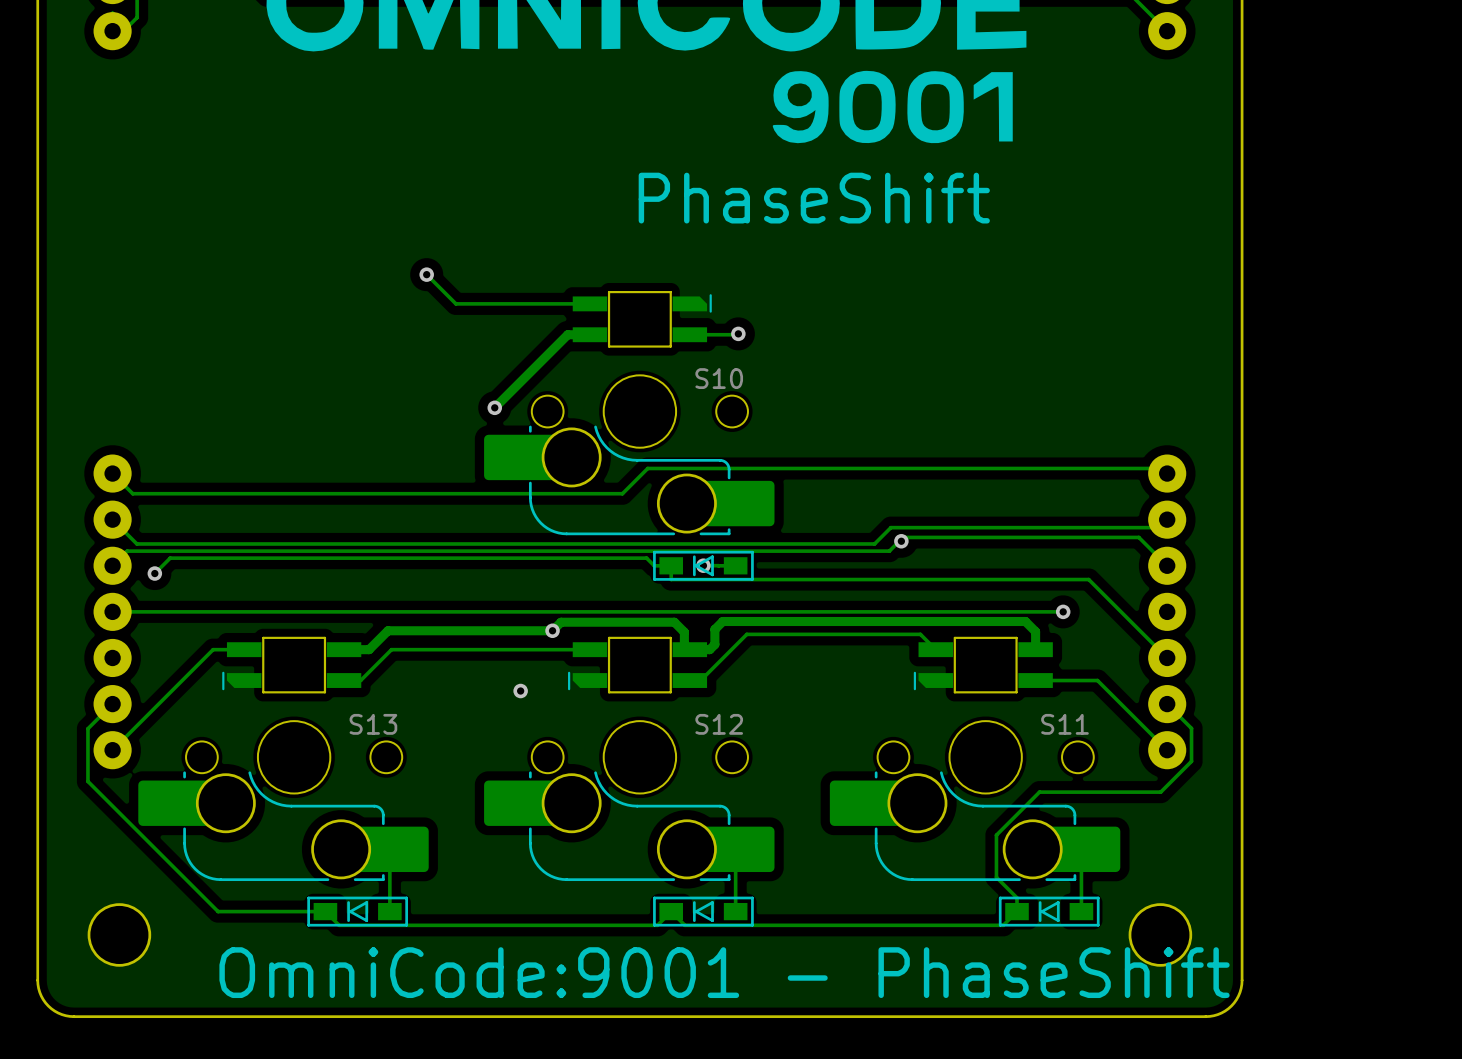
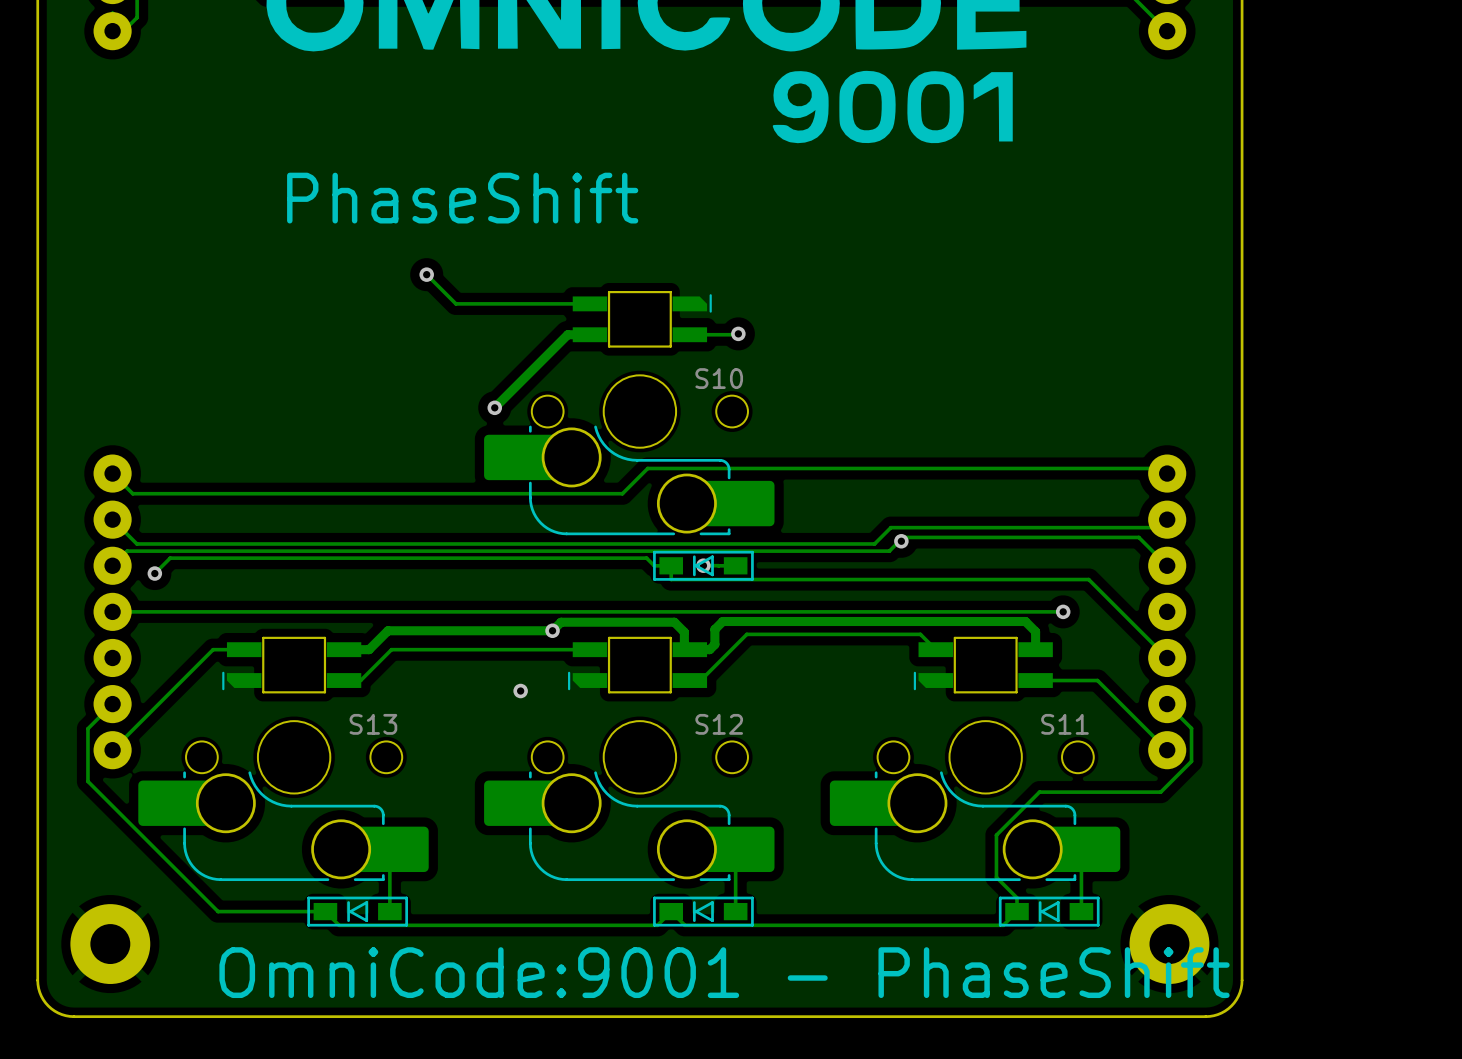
text position: PhaseShift (814, 198) -> PhaseShift (462, 198)
part footprint: [87, 903, 152, 967] -> [70, 904, 151, 984]
part footprint: [1128, 903, 1193, 967] -> [1129, 904, 1210, 984]

